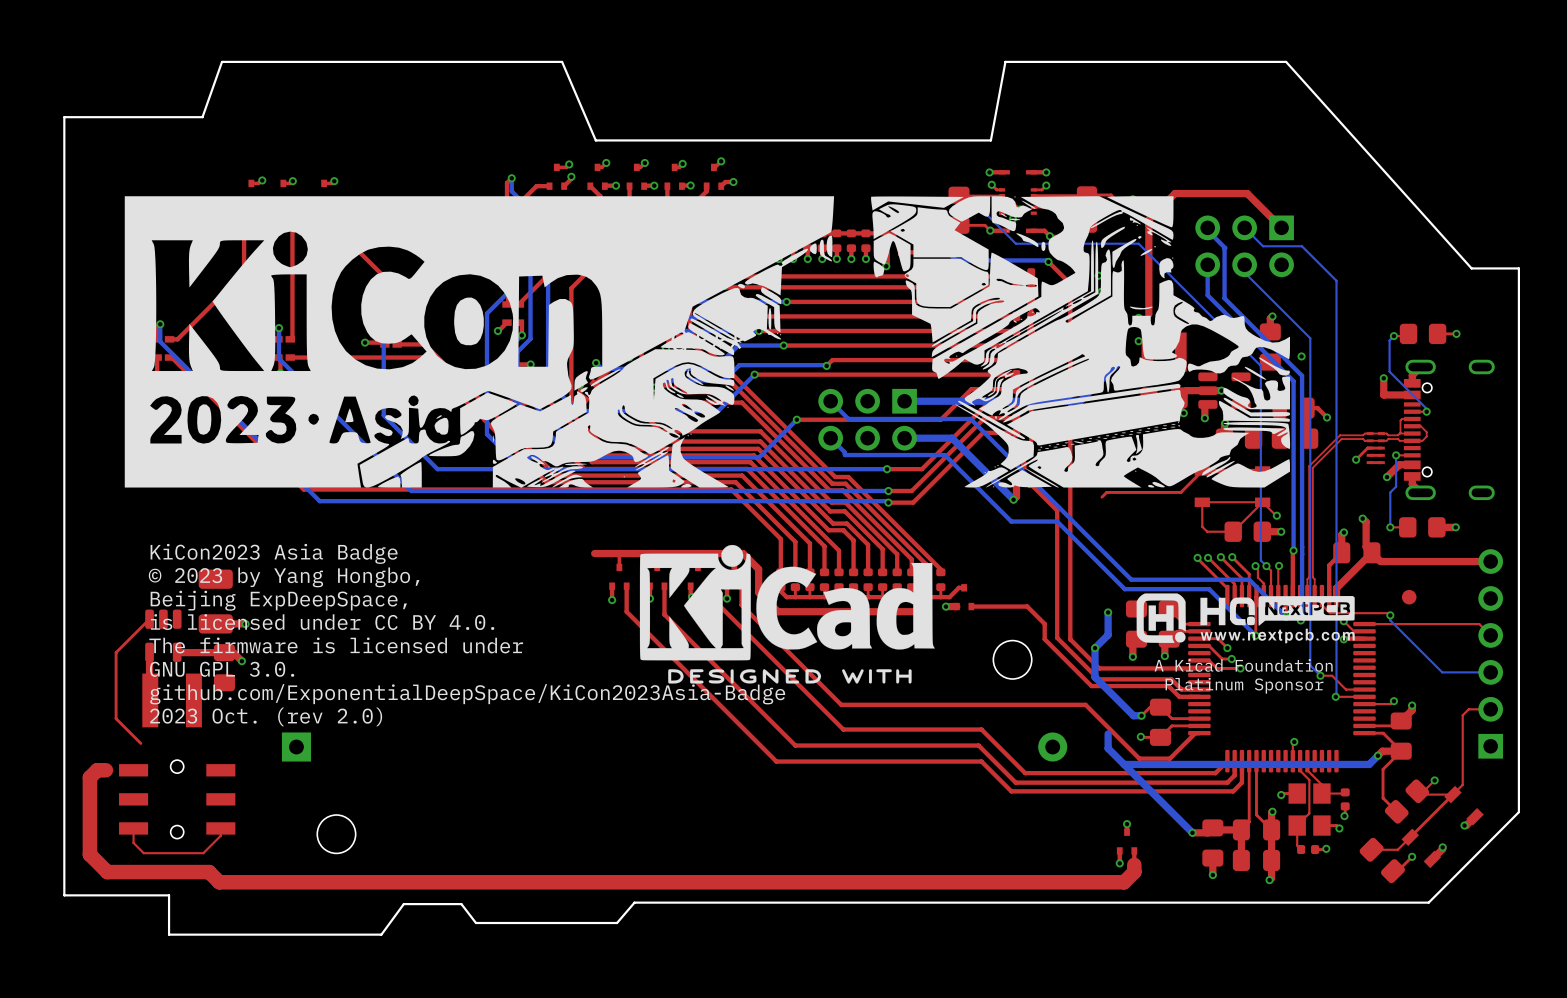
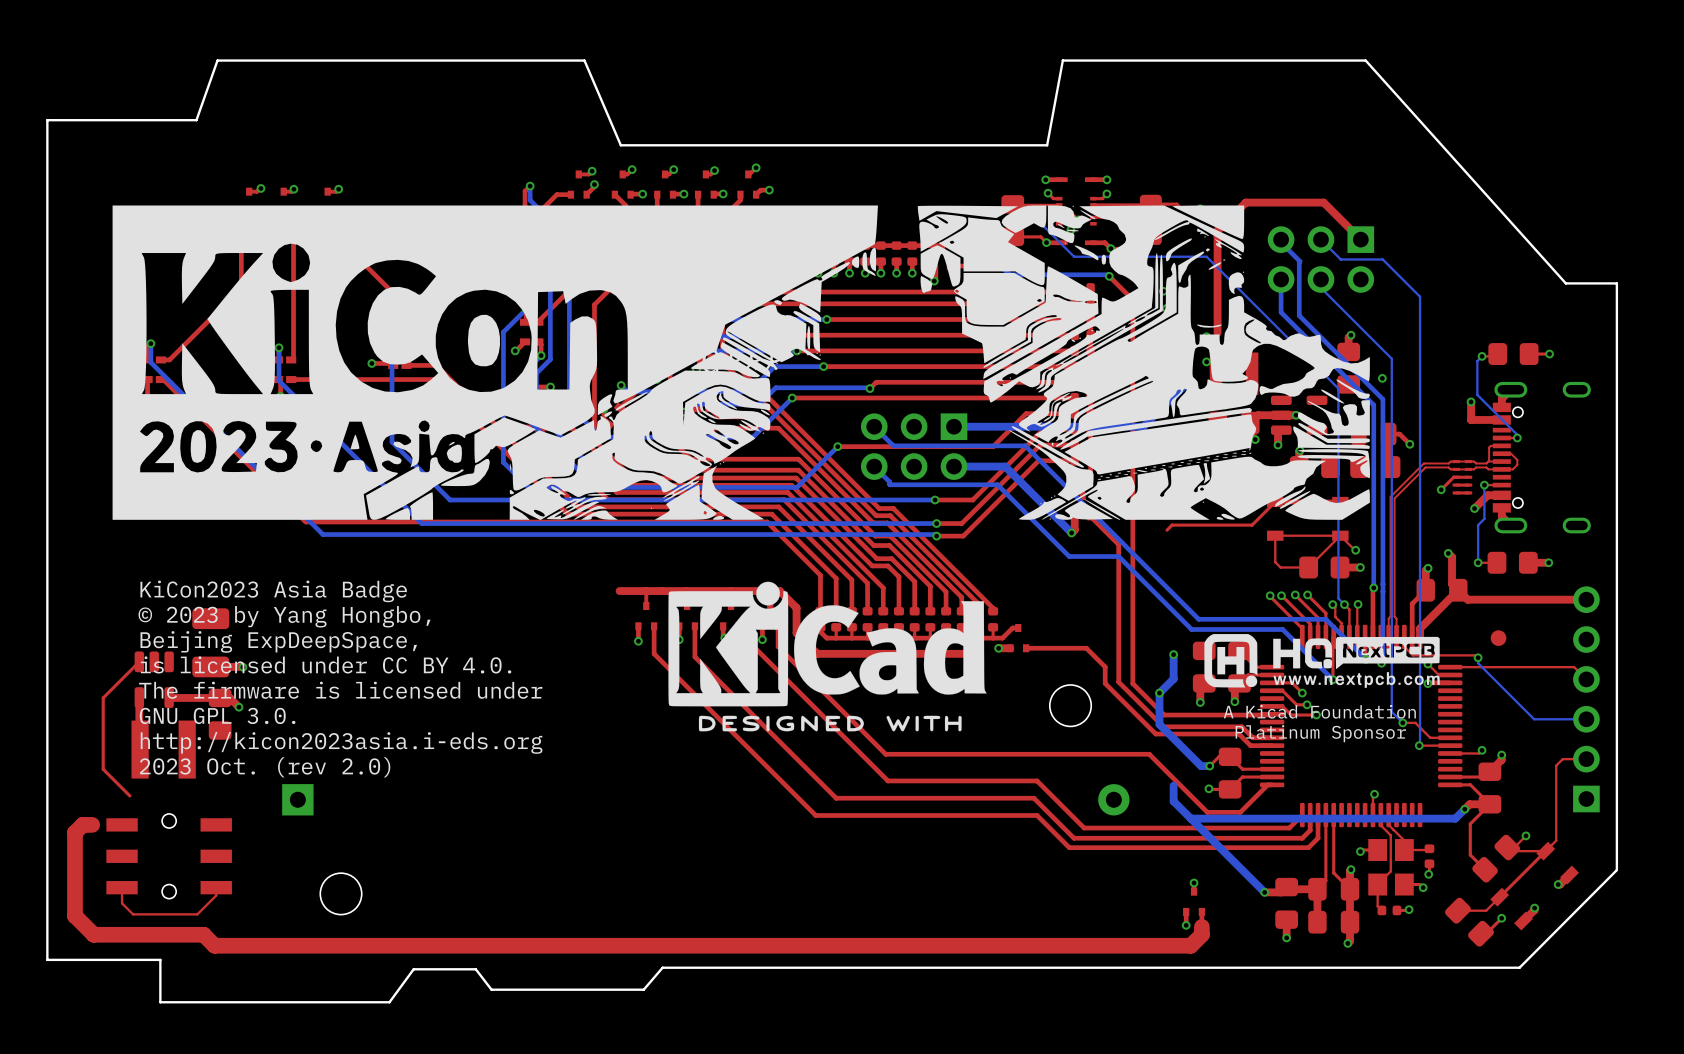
text: github.com/ExponentialDeepSpace/KiCon2023Asia-Badge (467, 694) -> http://kicon2023asia.i-eds.org (341, 742)

